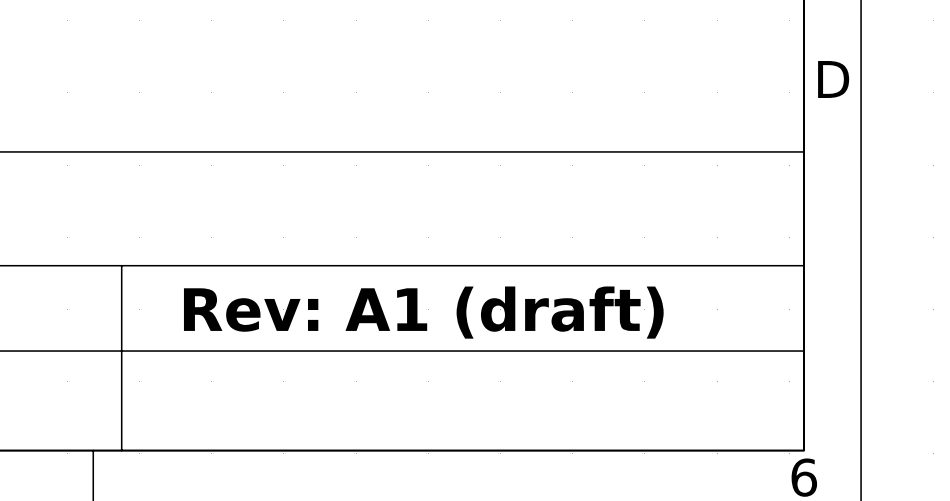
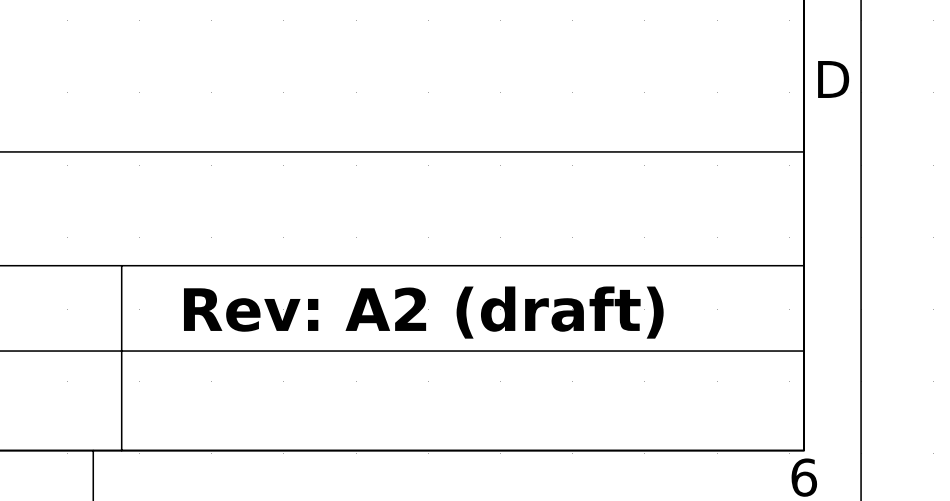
title block: Rev: A1 (draft) (423, 312) -> Rev: A2 (draft) (423, 312)

